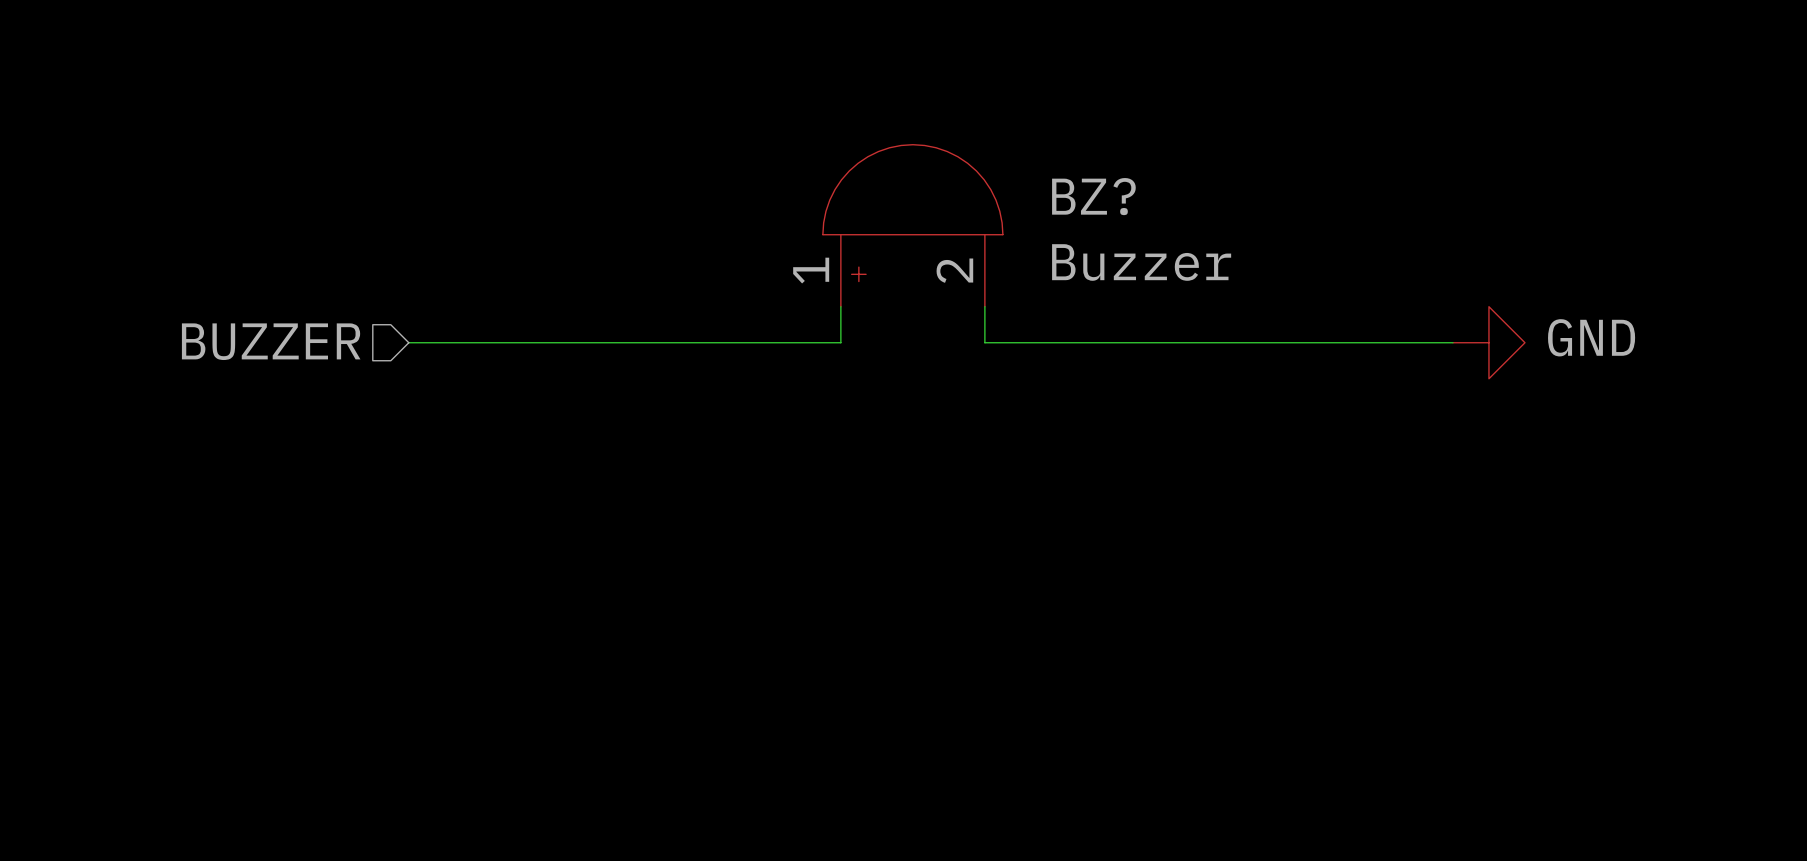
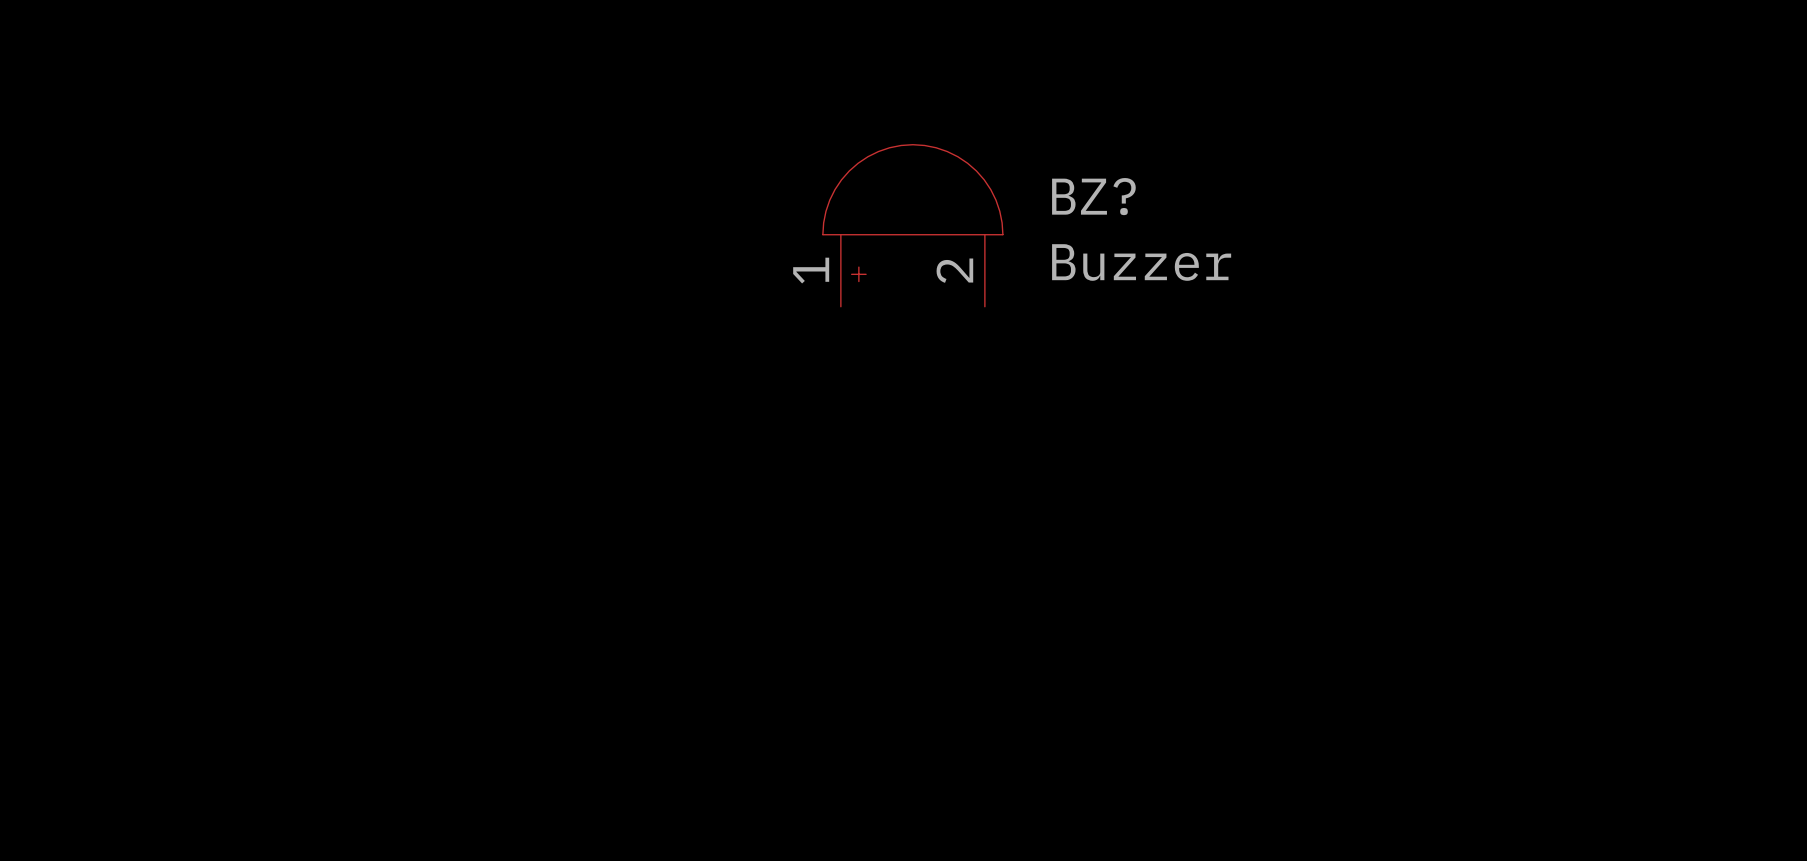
wire: (840, 306) (840, 342) (408, 342) -> none
wire: (984, 306) (984, 342) (1452, 342) -> none
hierarchical label: BUZZER (271, 341) -> none
power symbol: GND (1488, 342) -> none

